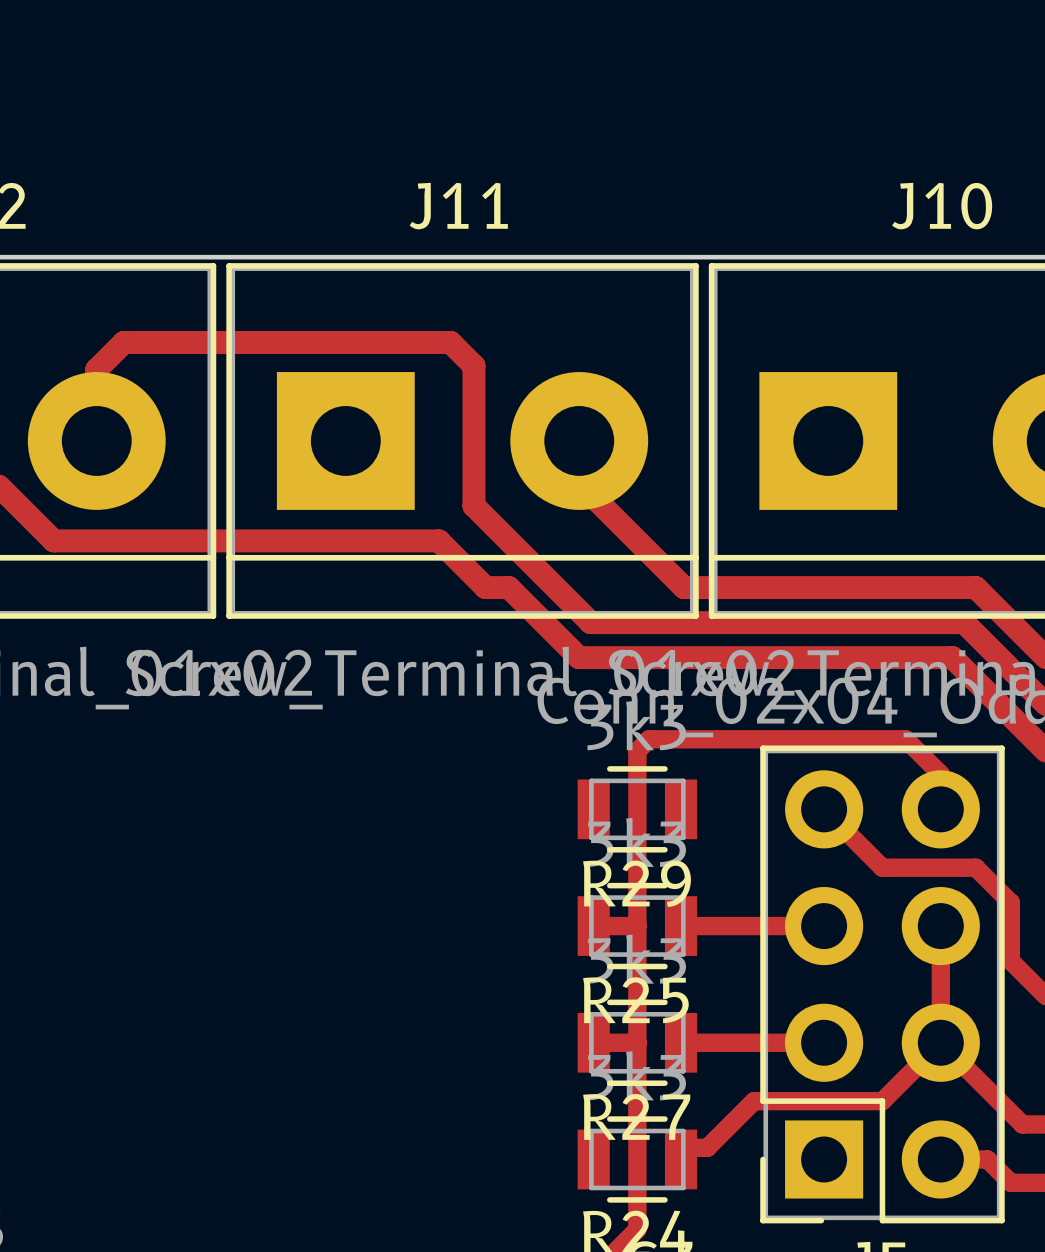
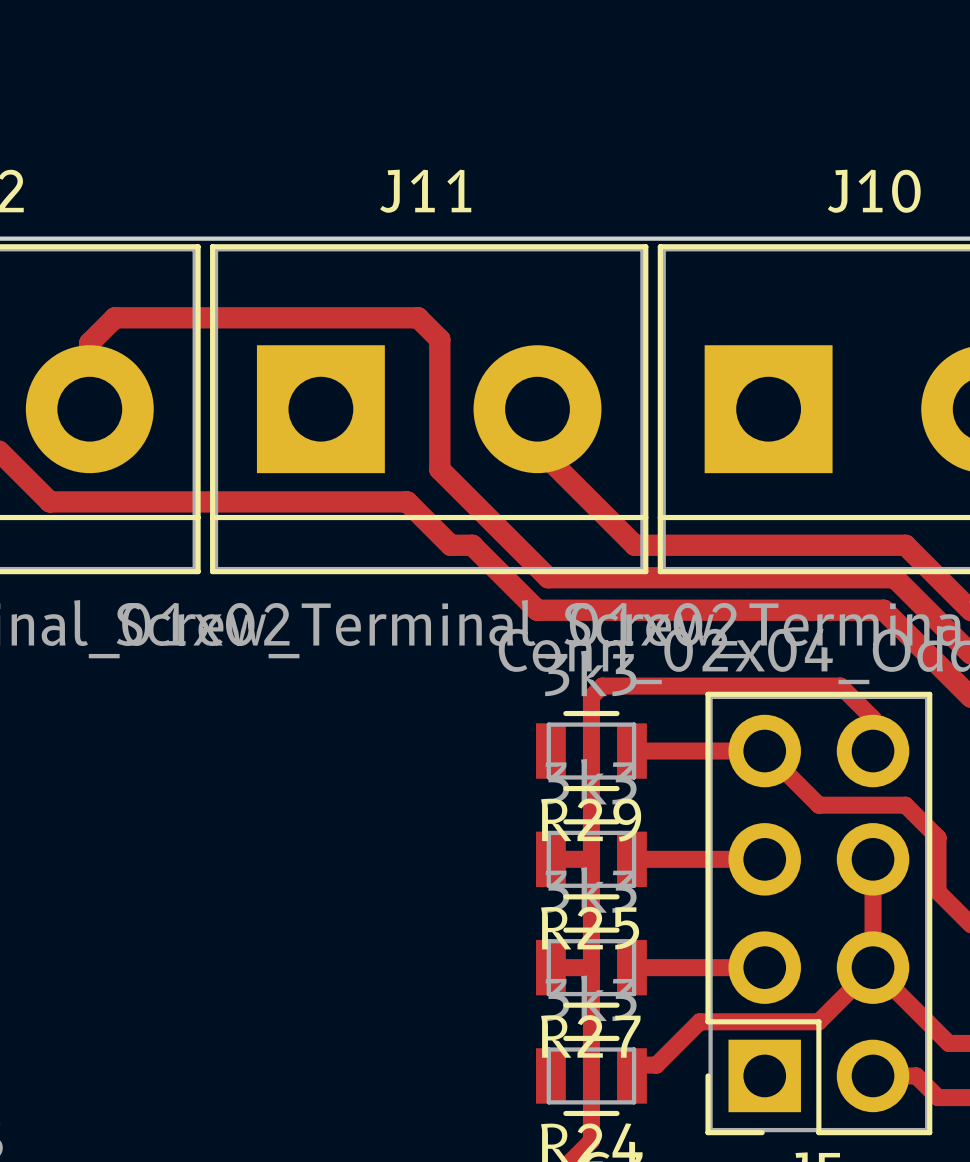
track: none -> (631, 751) (764, 751)

